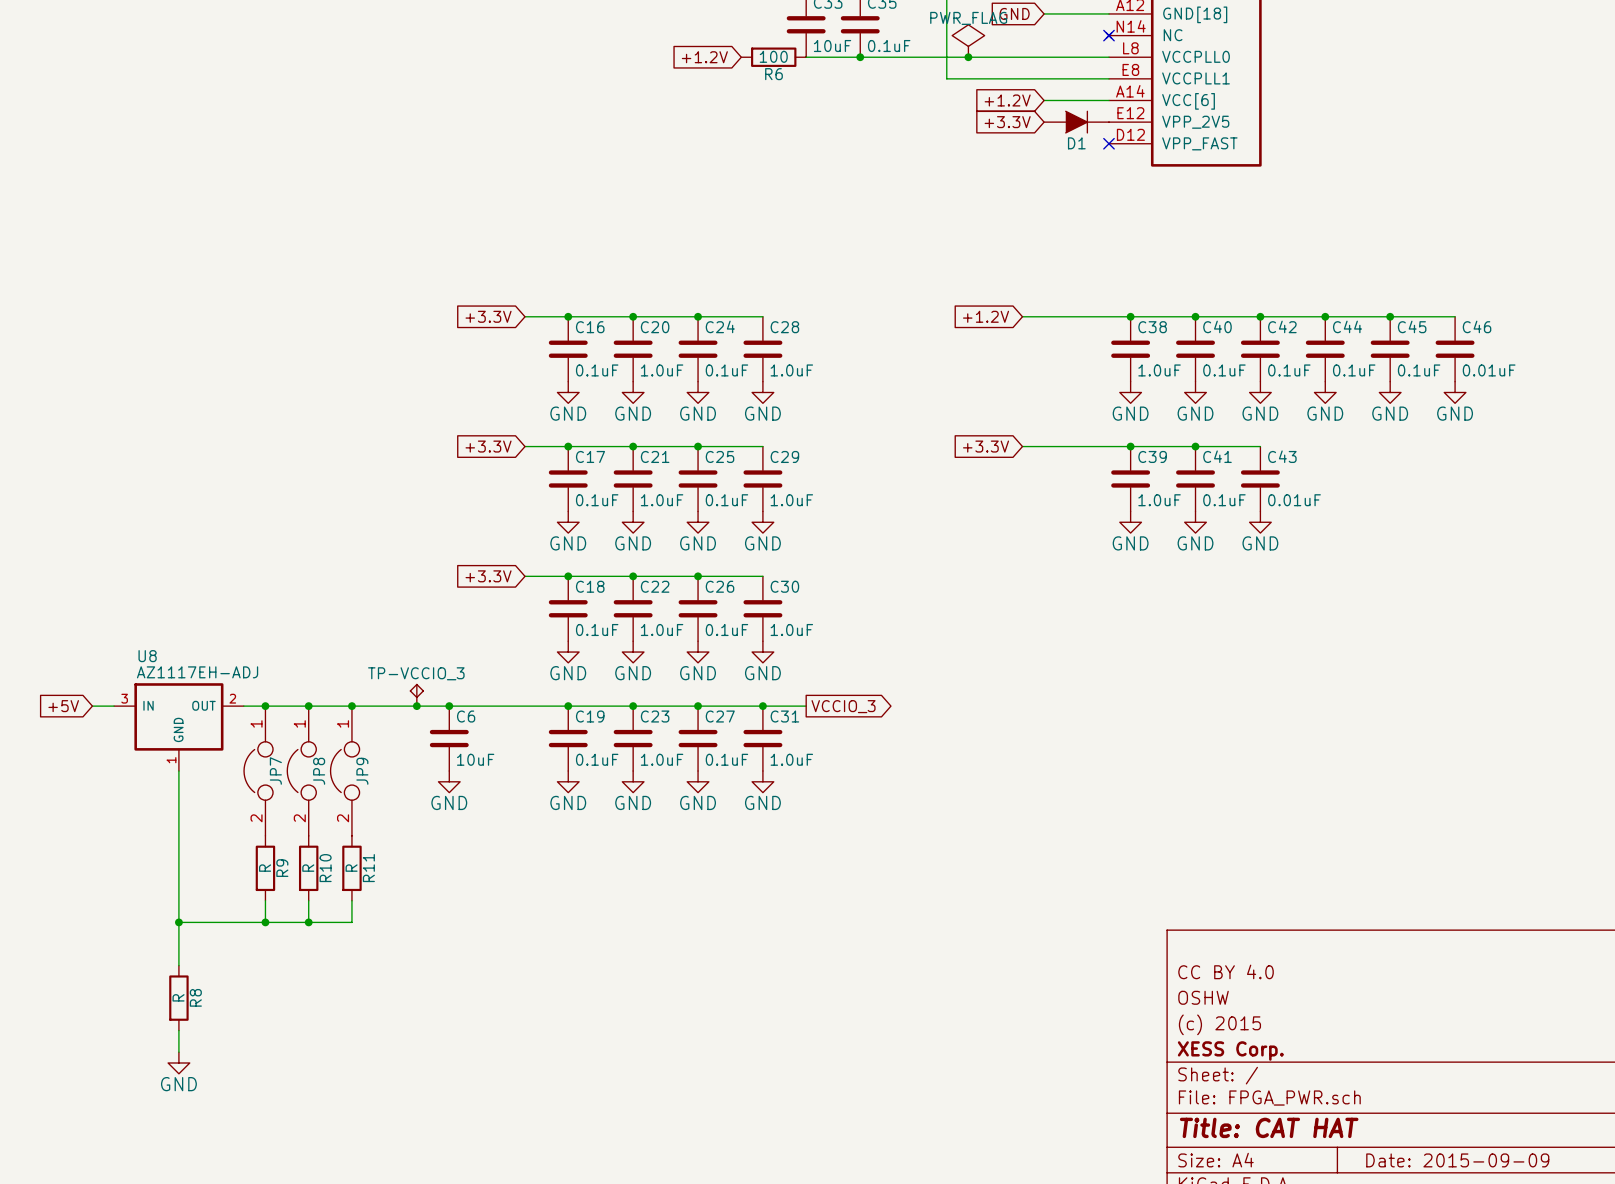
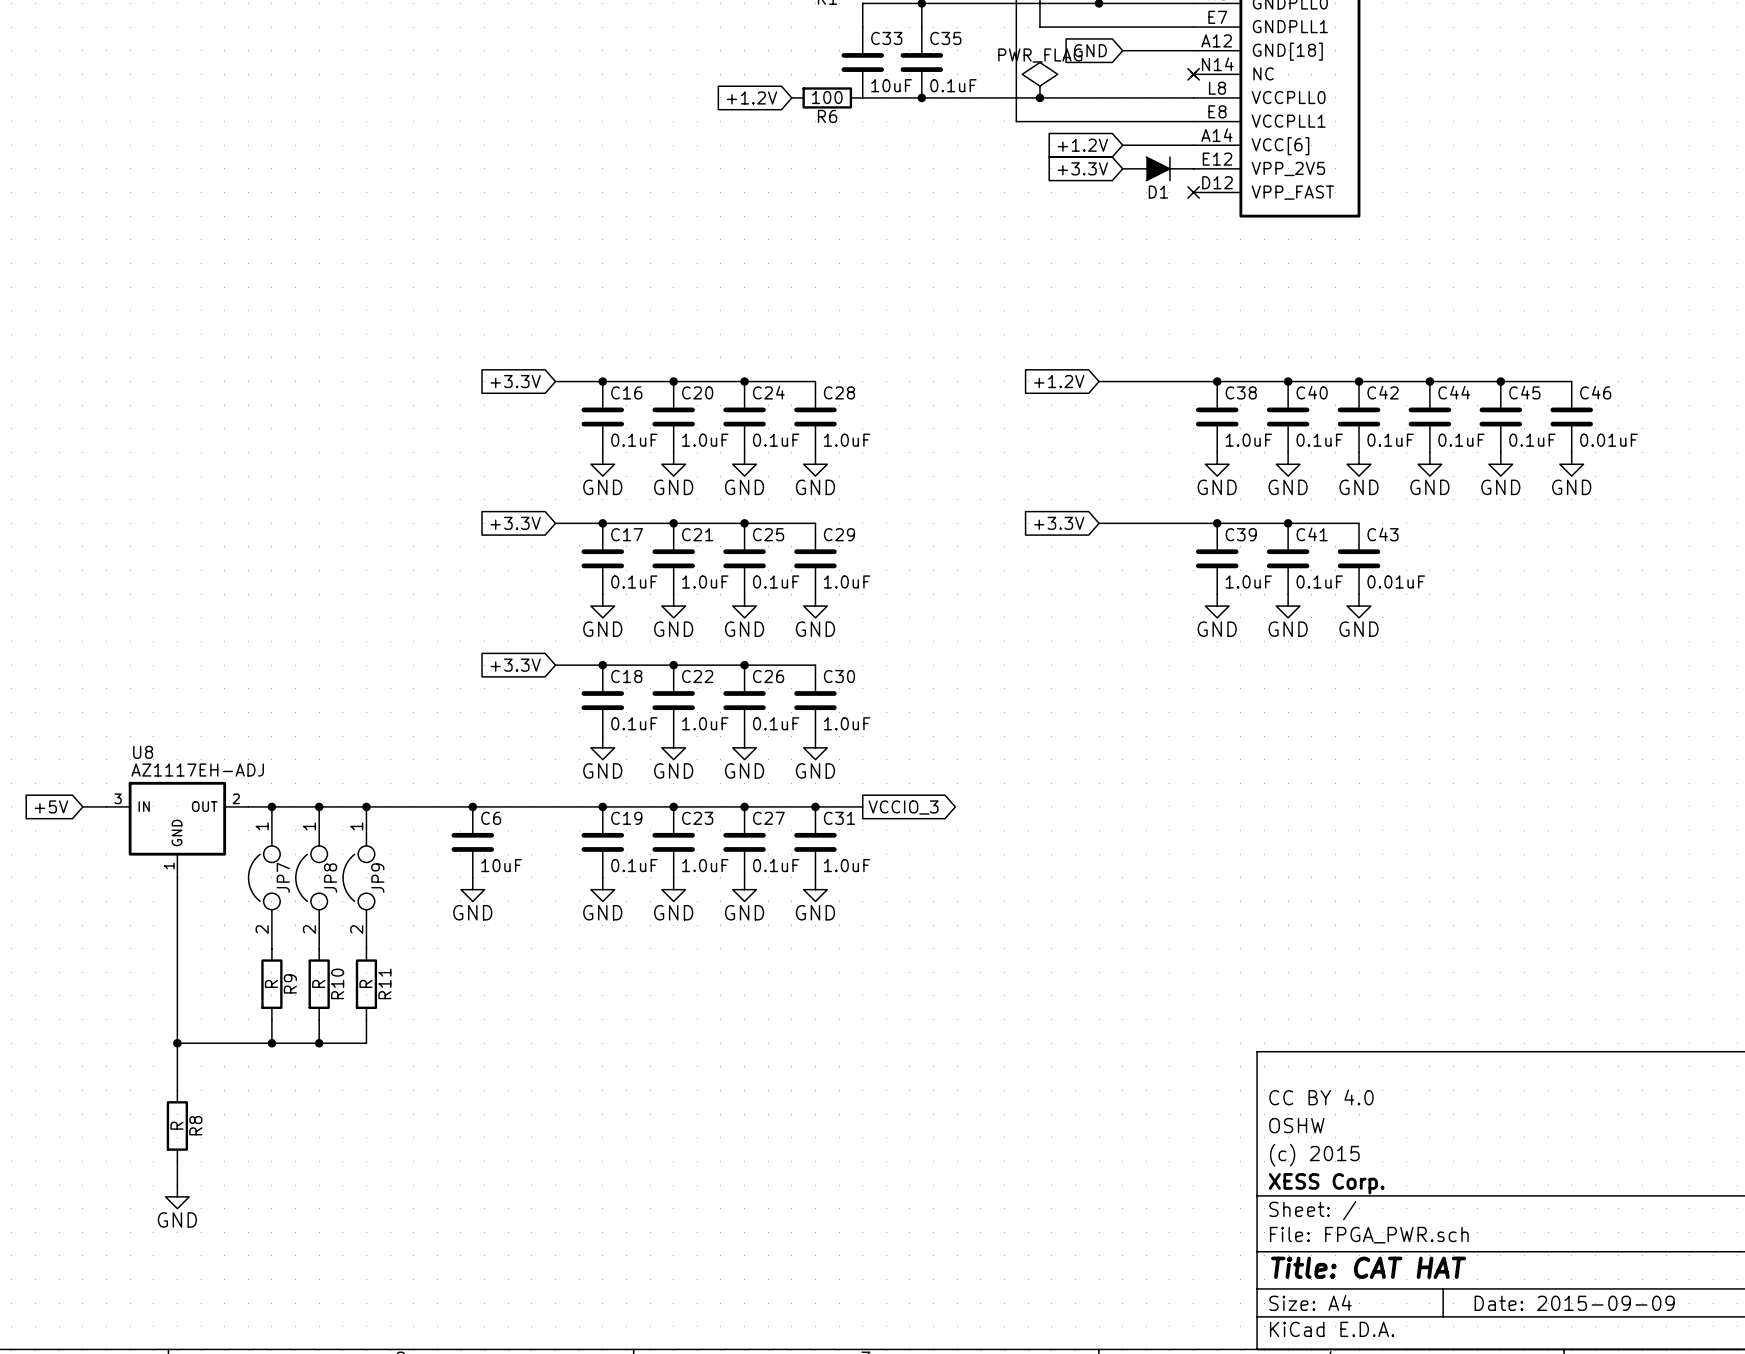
TP-VCCIO_3: (416, 695) -> none
junction: (416, 706) -> none

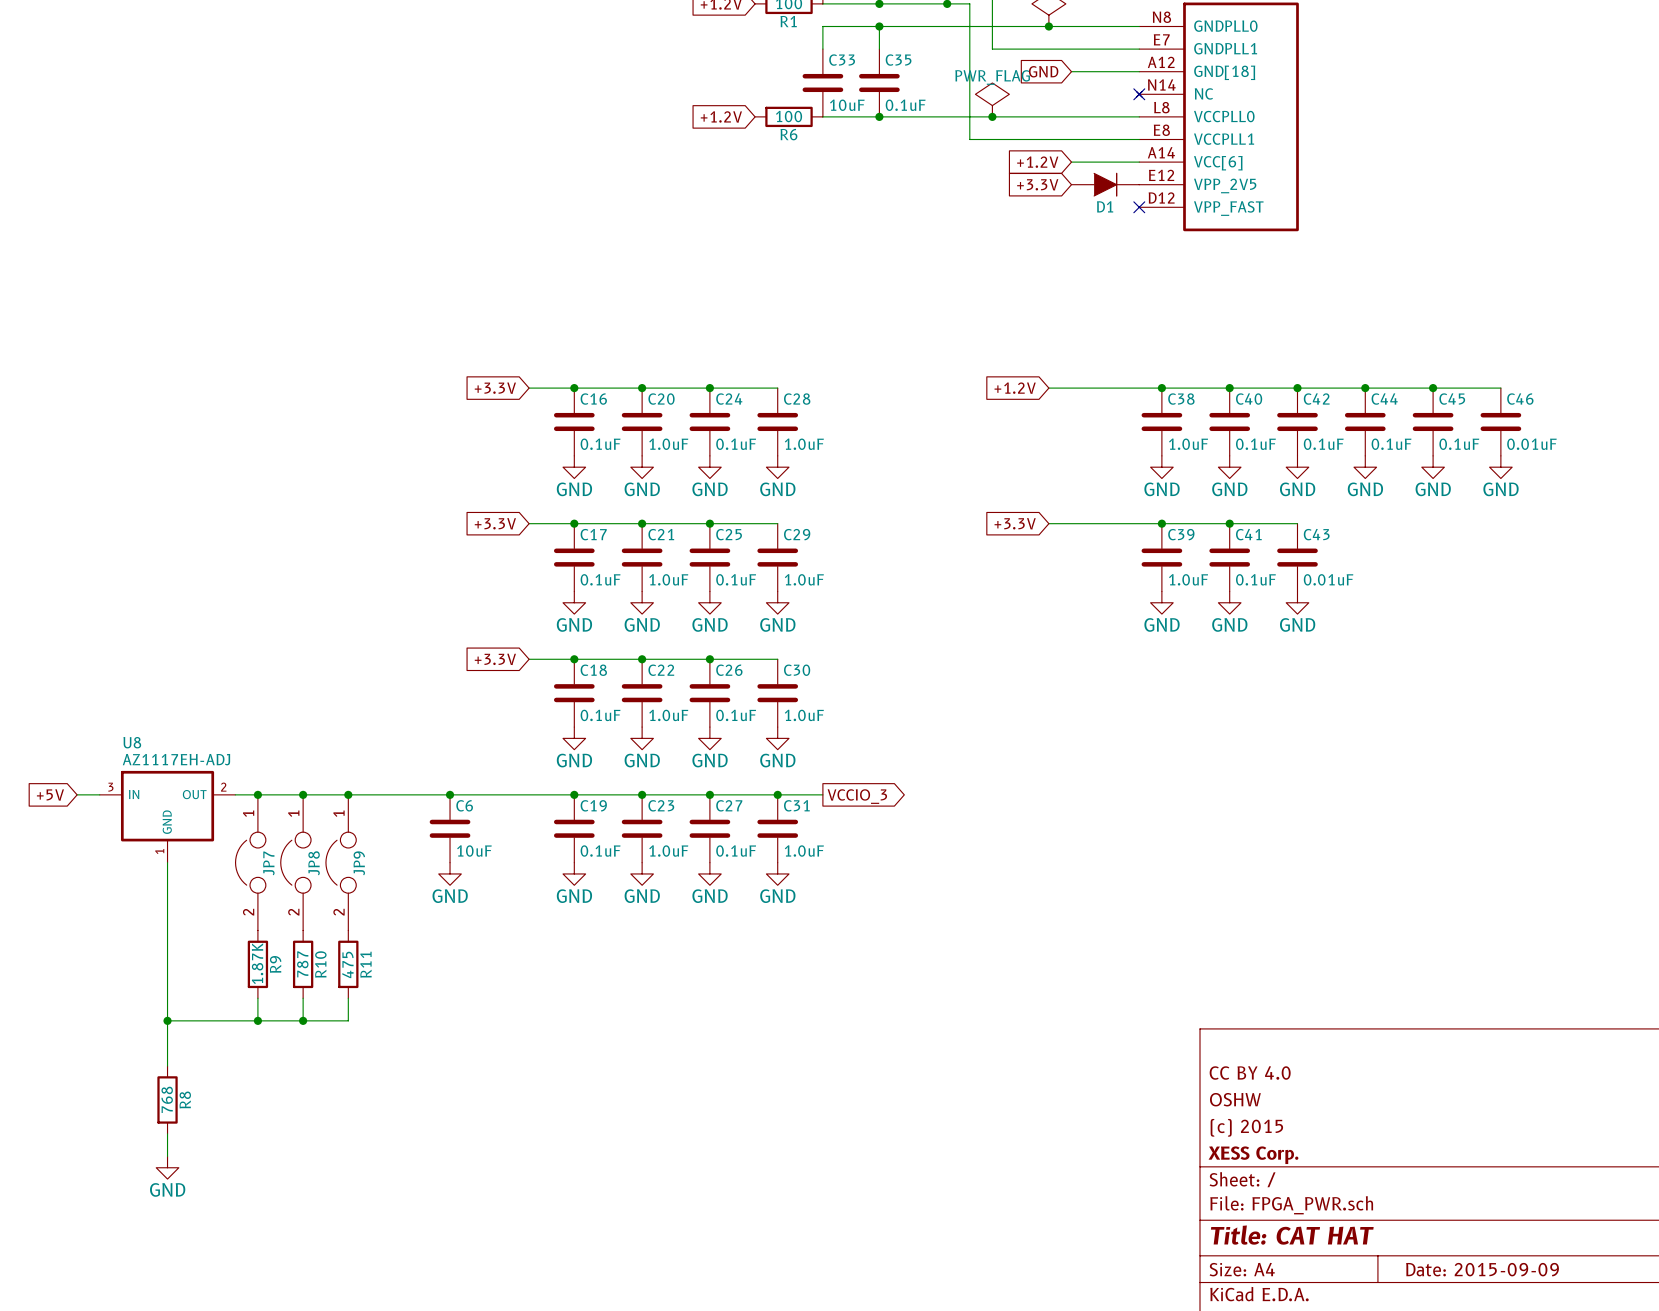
R9 value: R (271, 983) -> 1.87K (257, 963)
R10 value: R (318, 983) -> 787 (302, 964)
R11 value: R (366, 983) -> 475 (347, 964)
R8 value: R (176, 1125) -> 768 (167, 1099)

